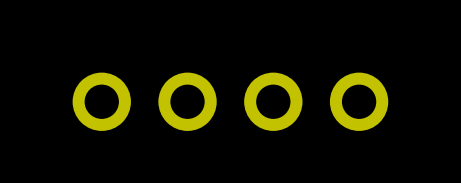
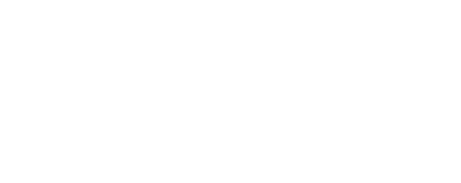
part: (230, 101) -> none

